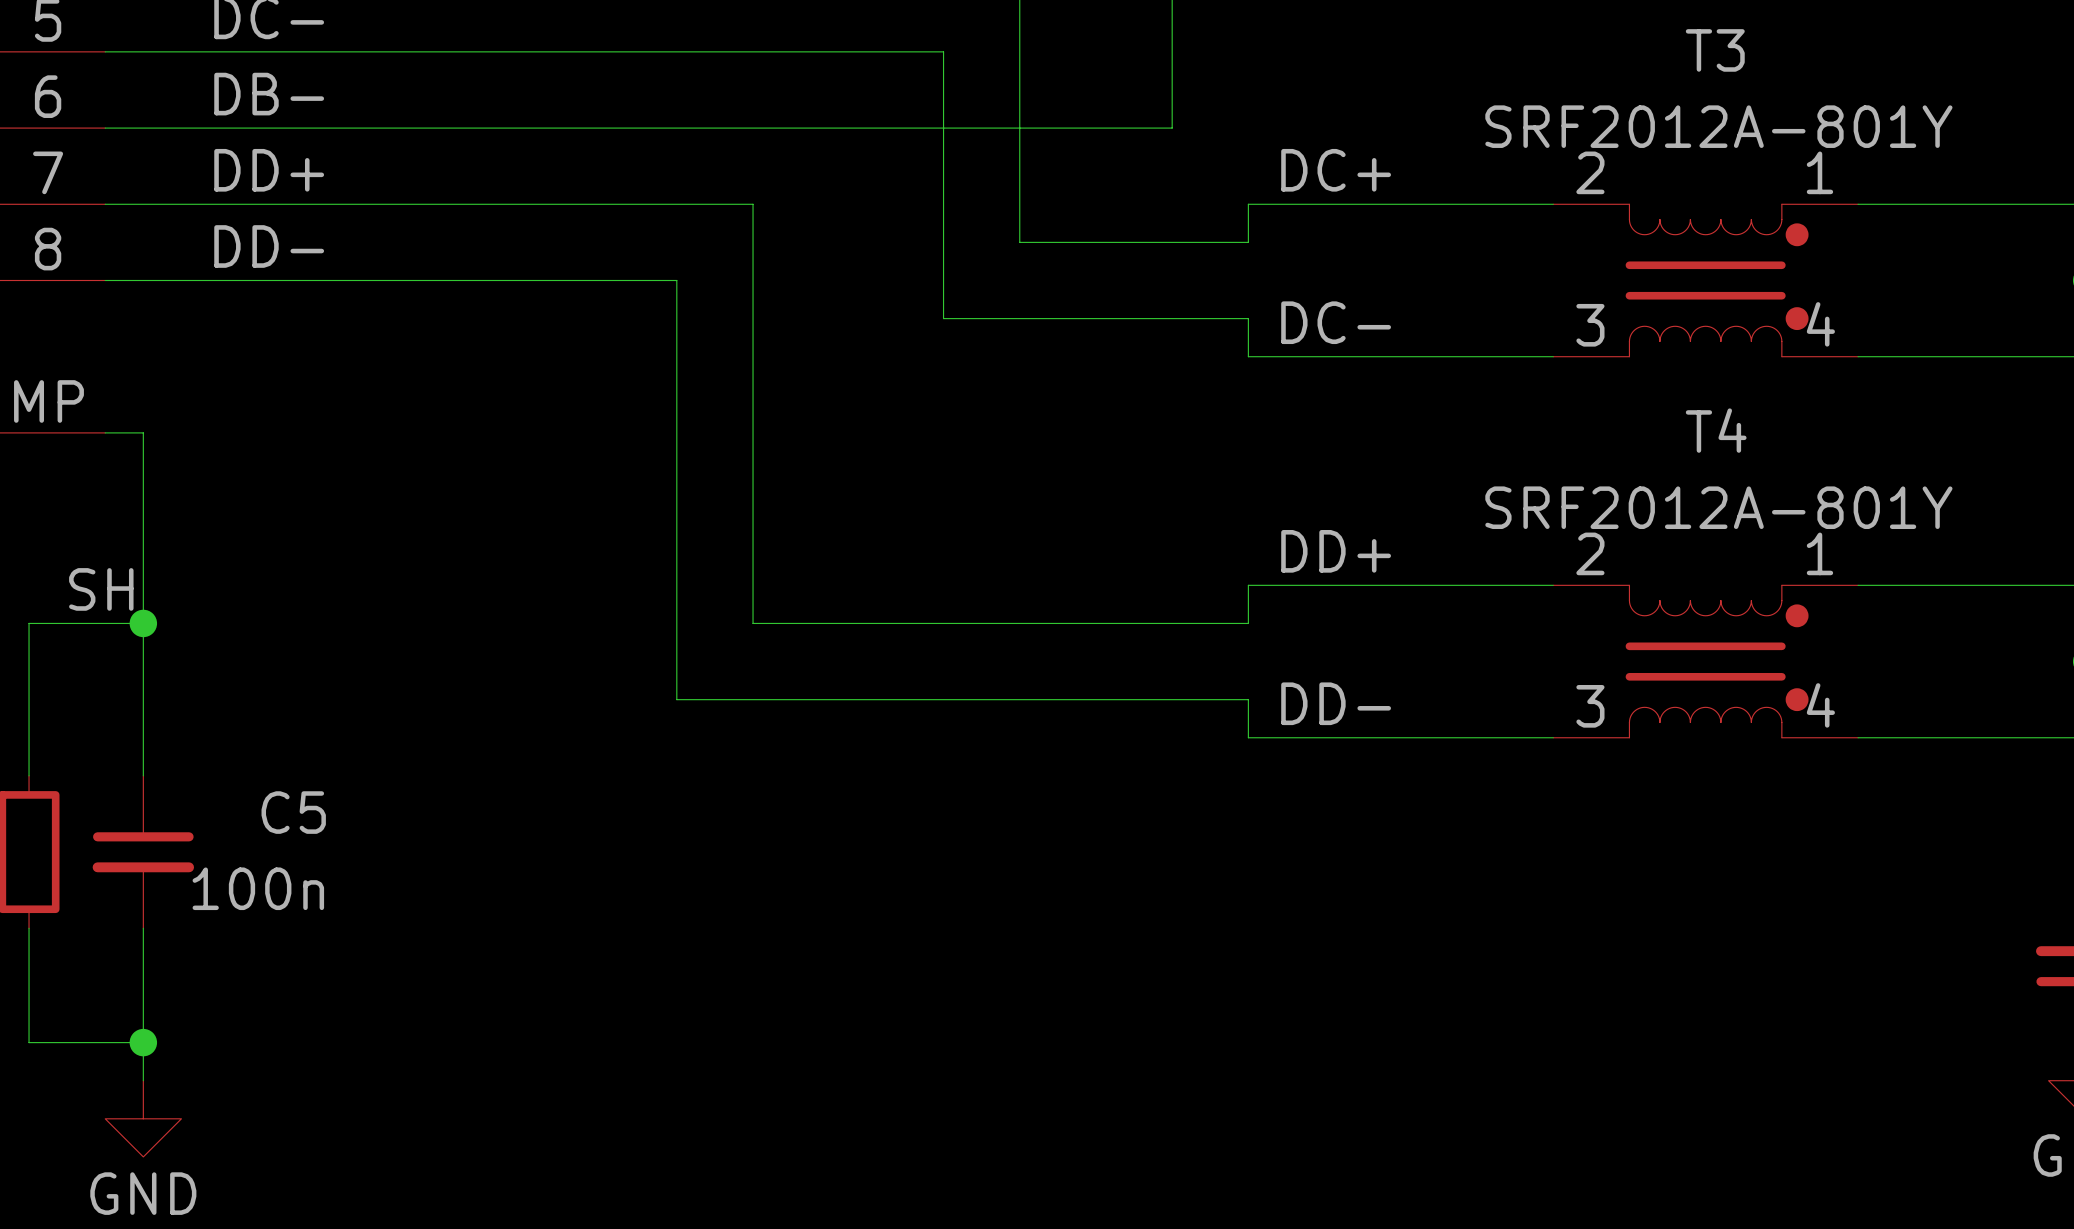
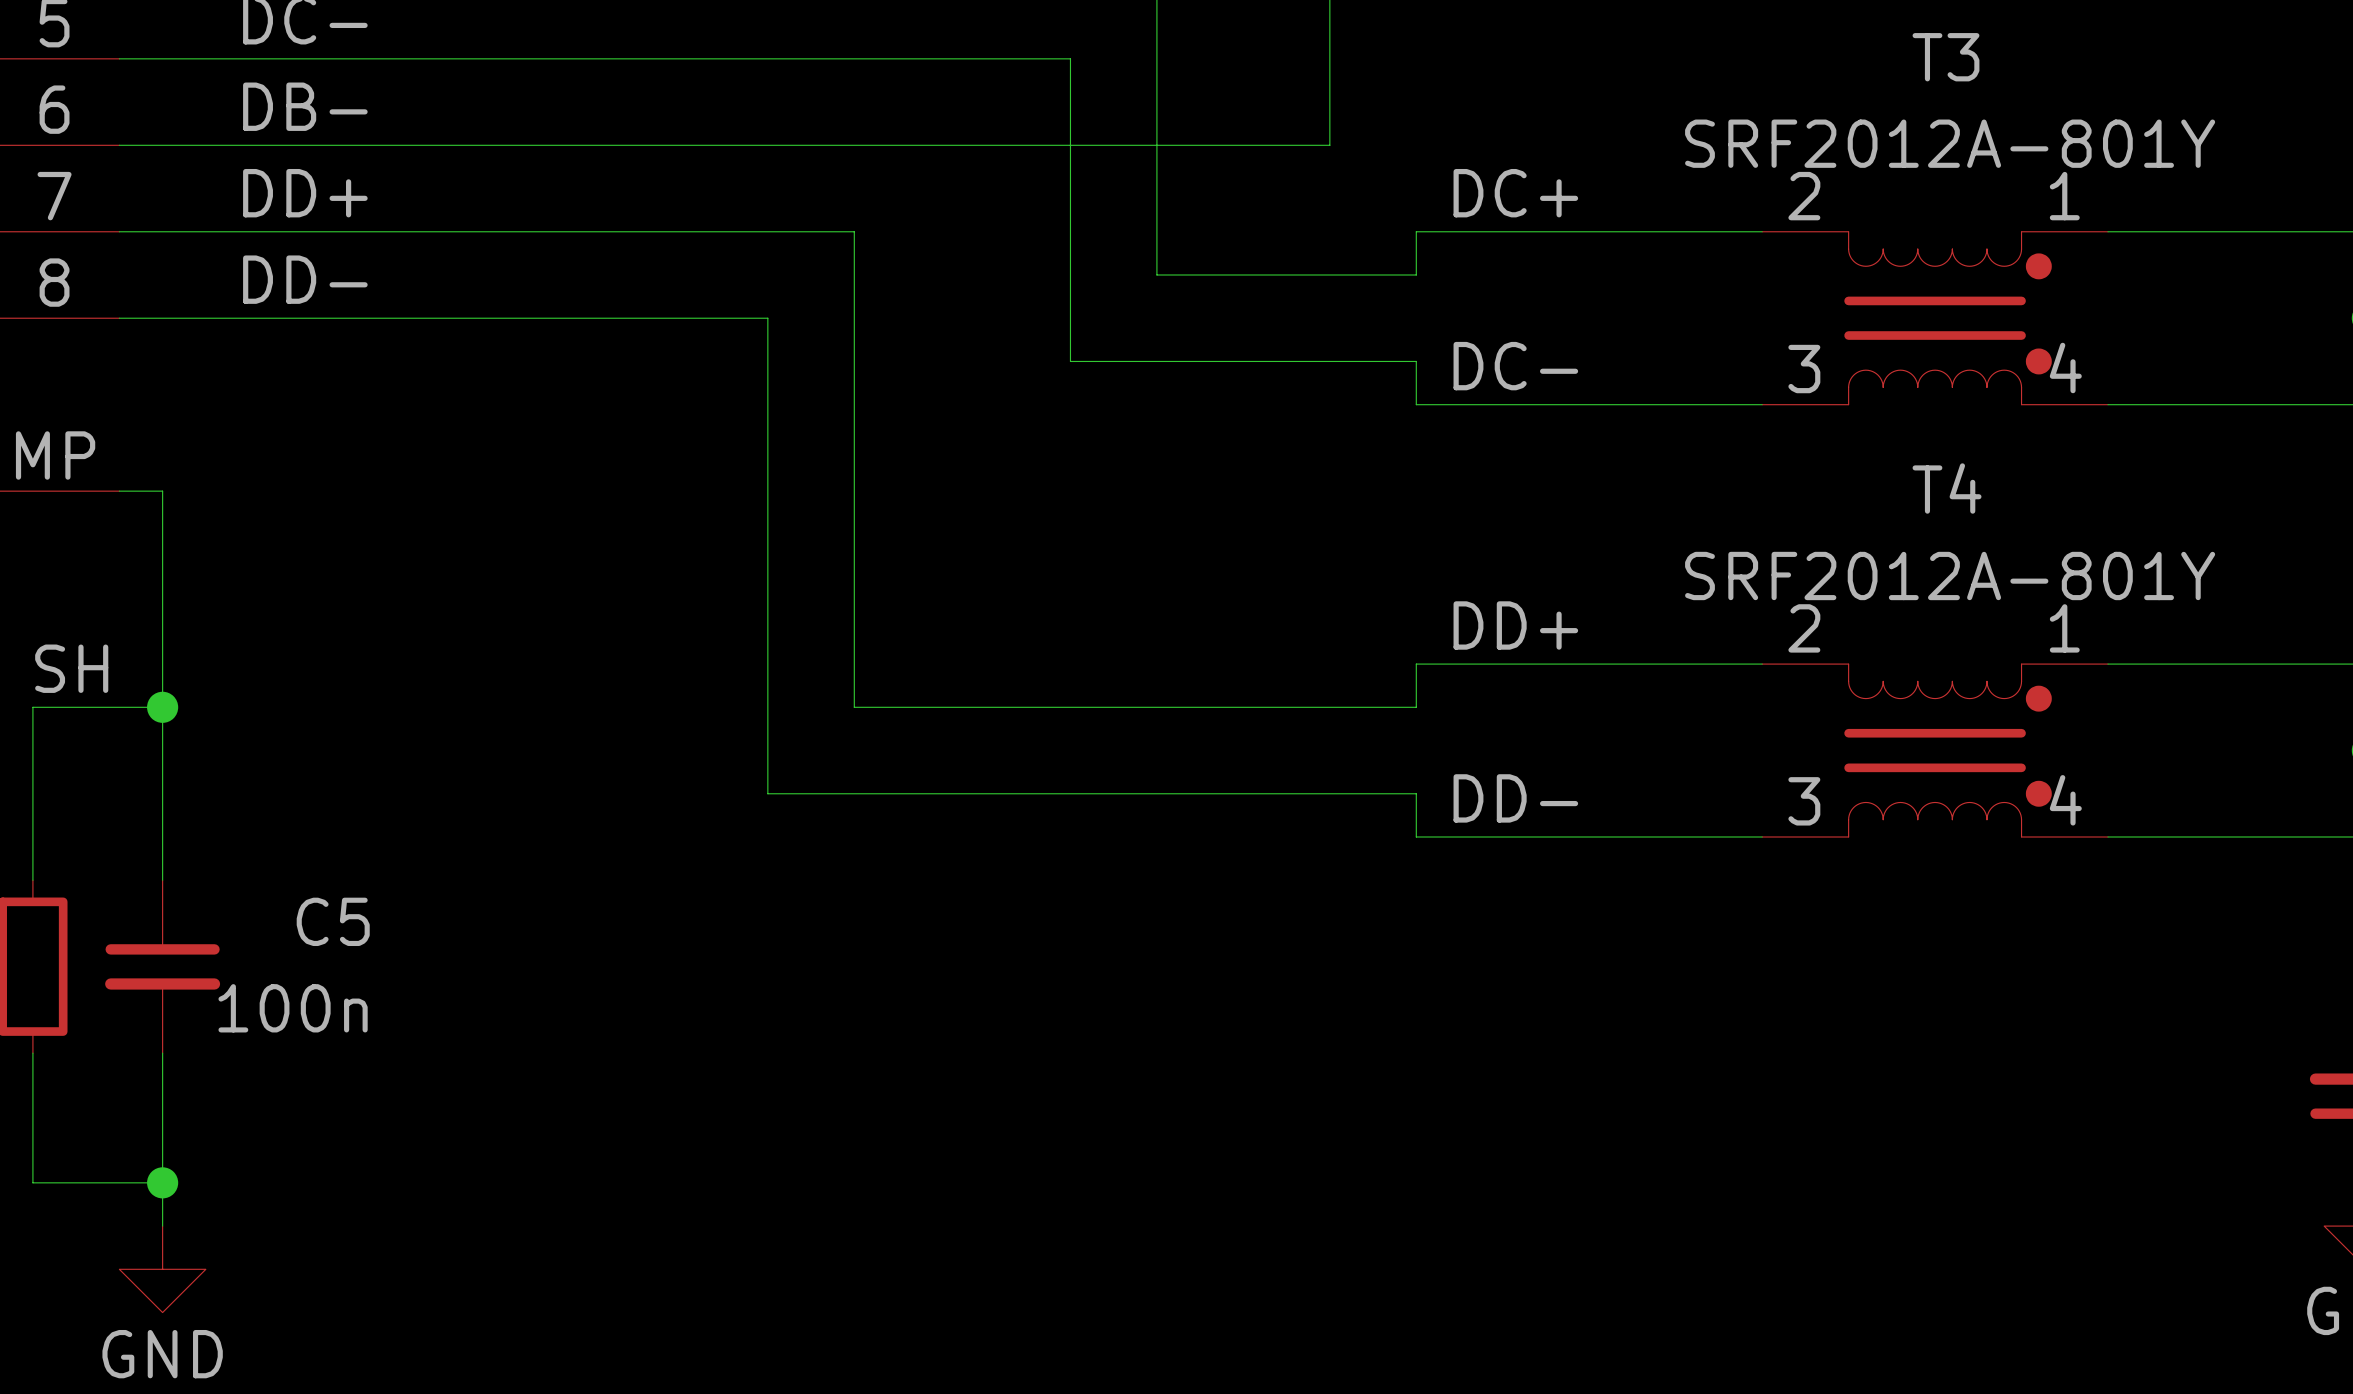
label position: SH (101, 589) -> SH (71, 668)

